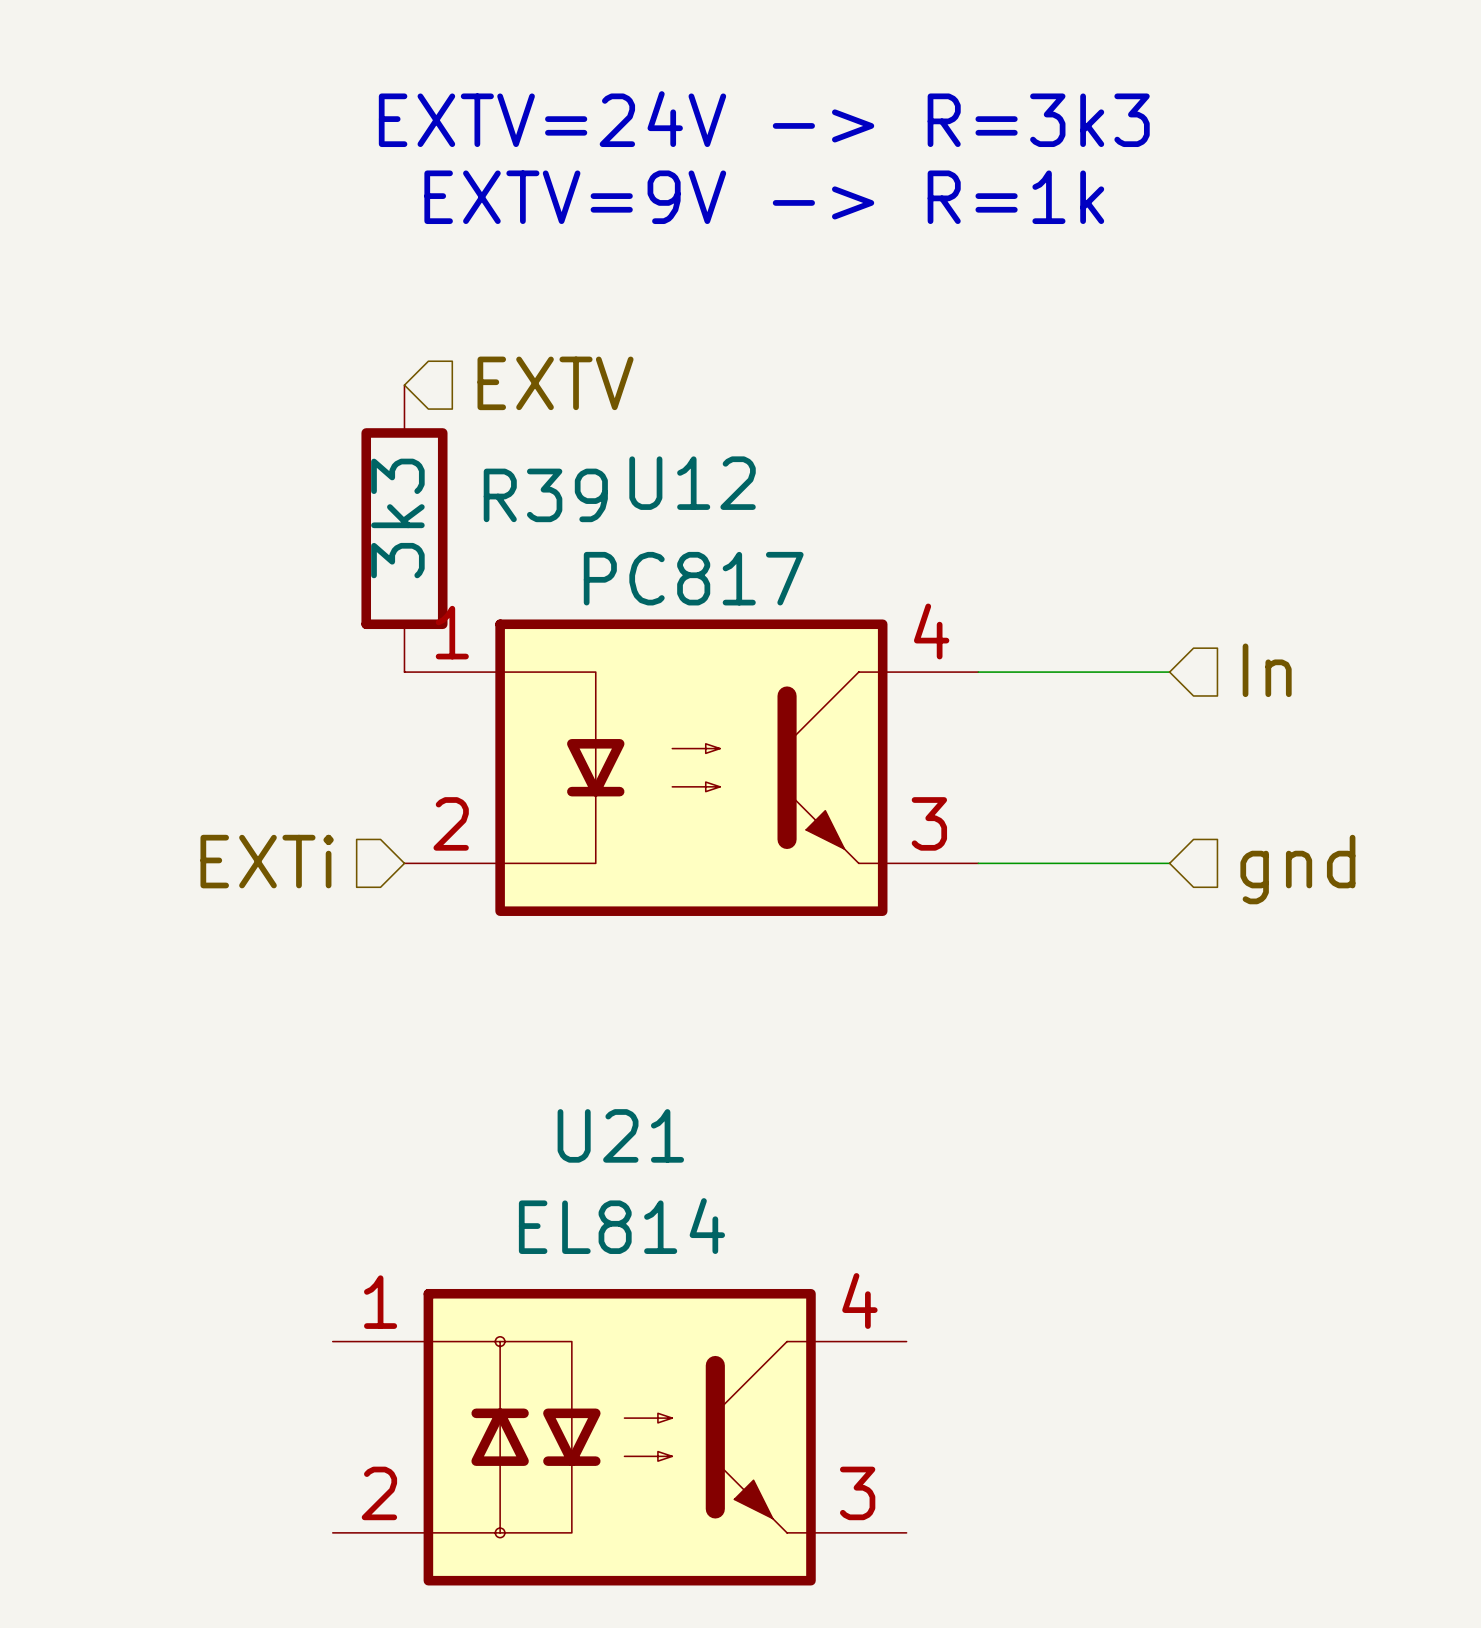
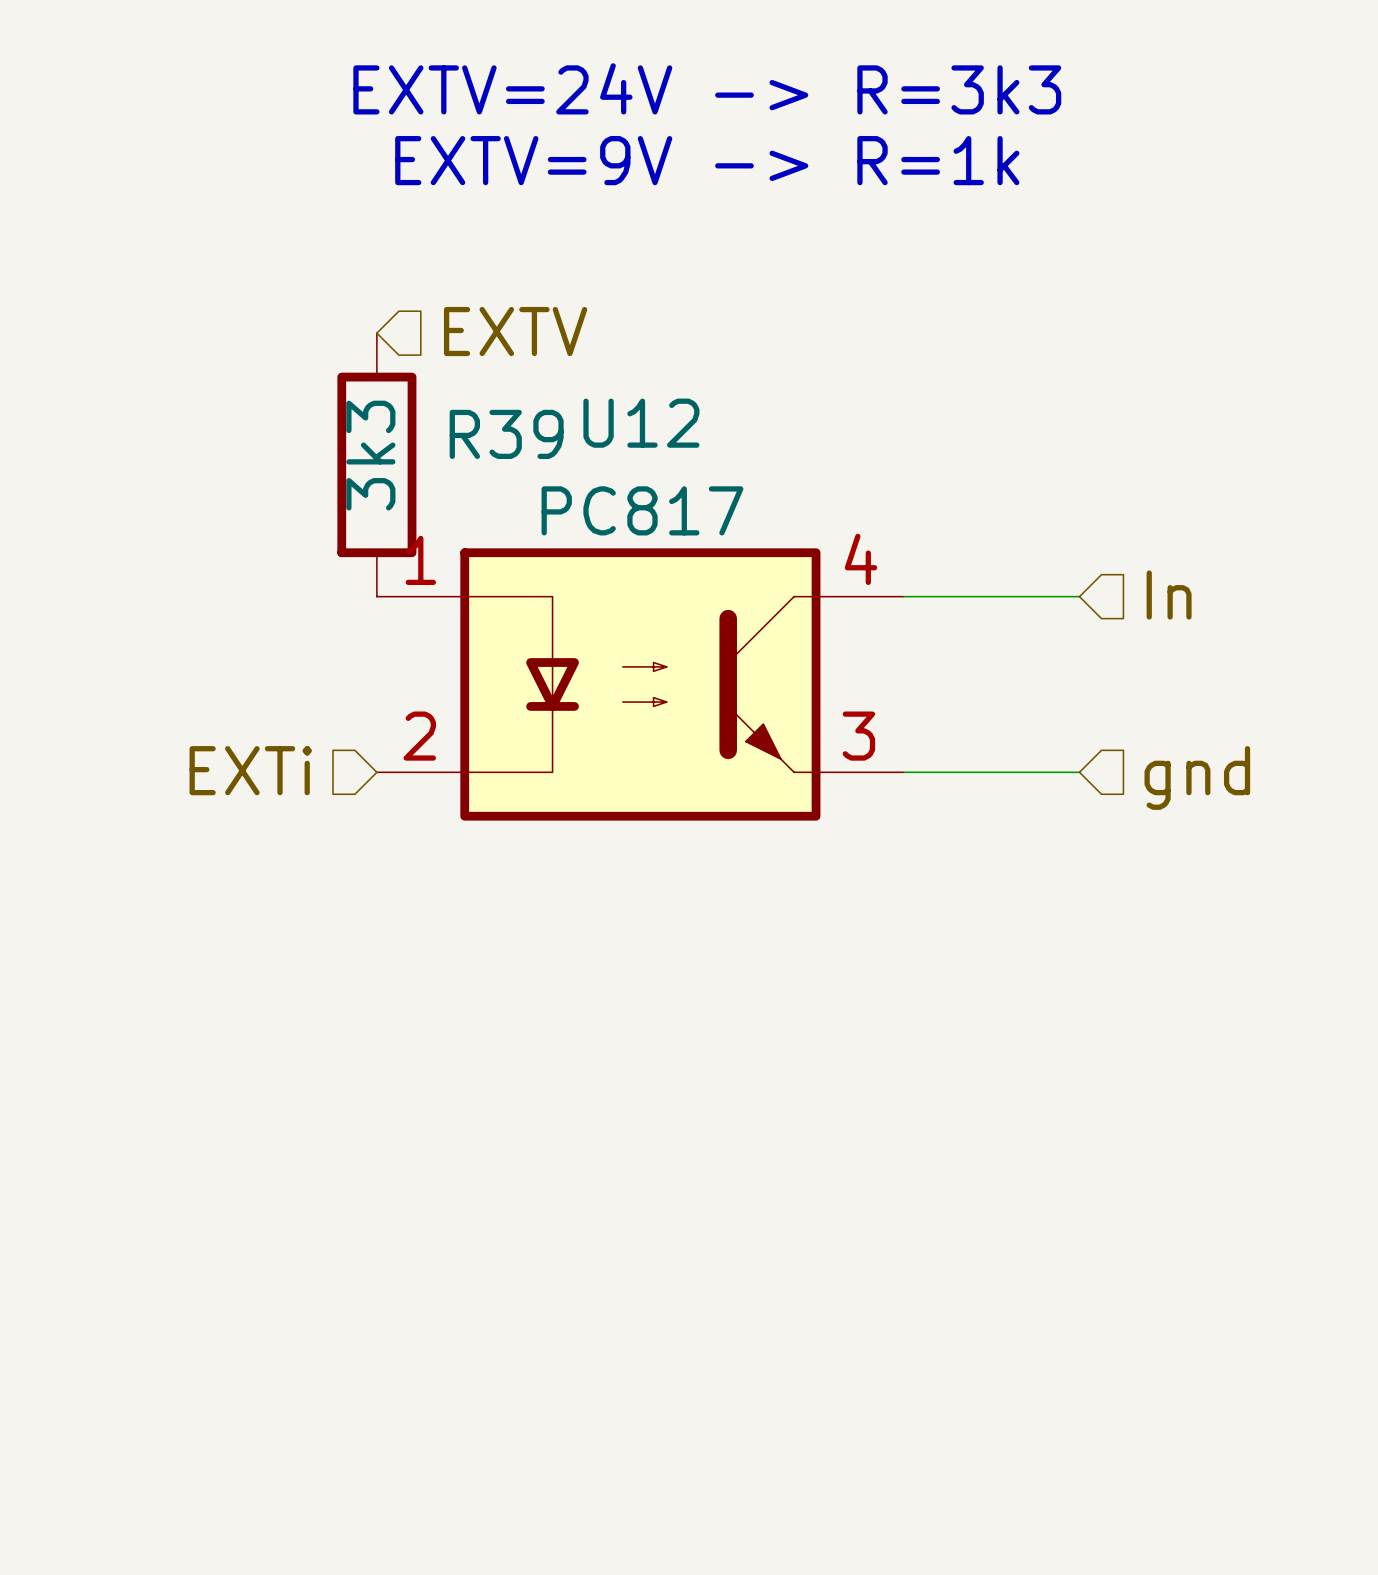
U21: EL814 (619, 1437) -> none

